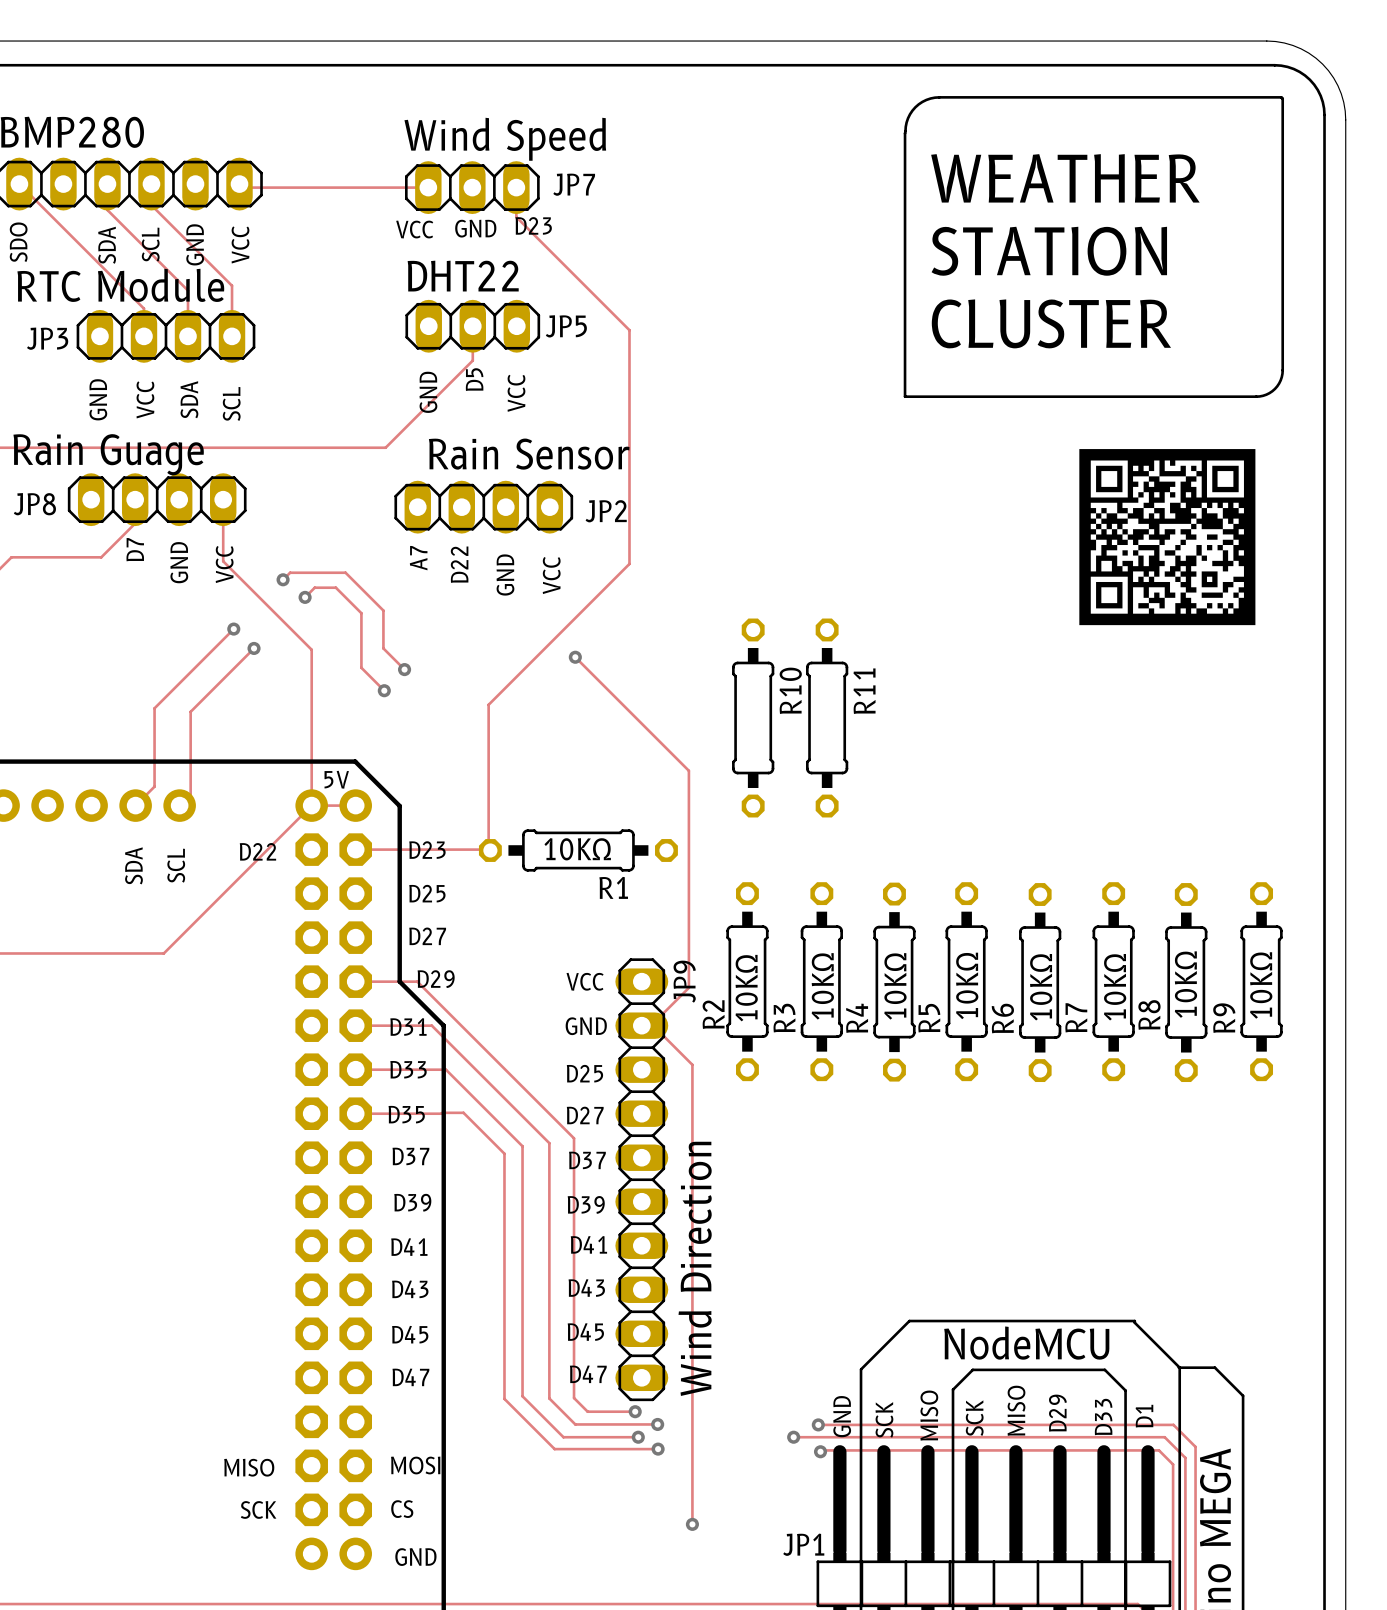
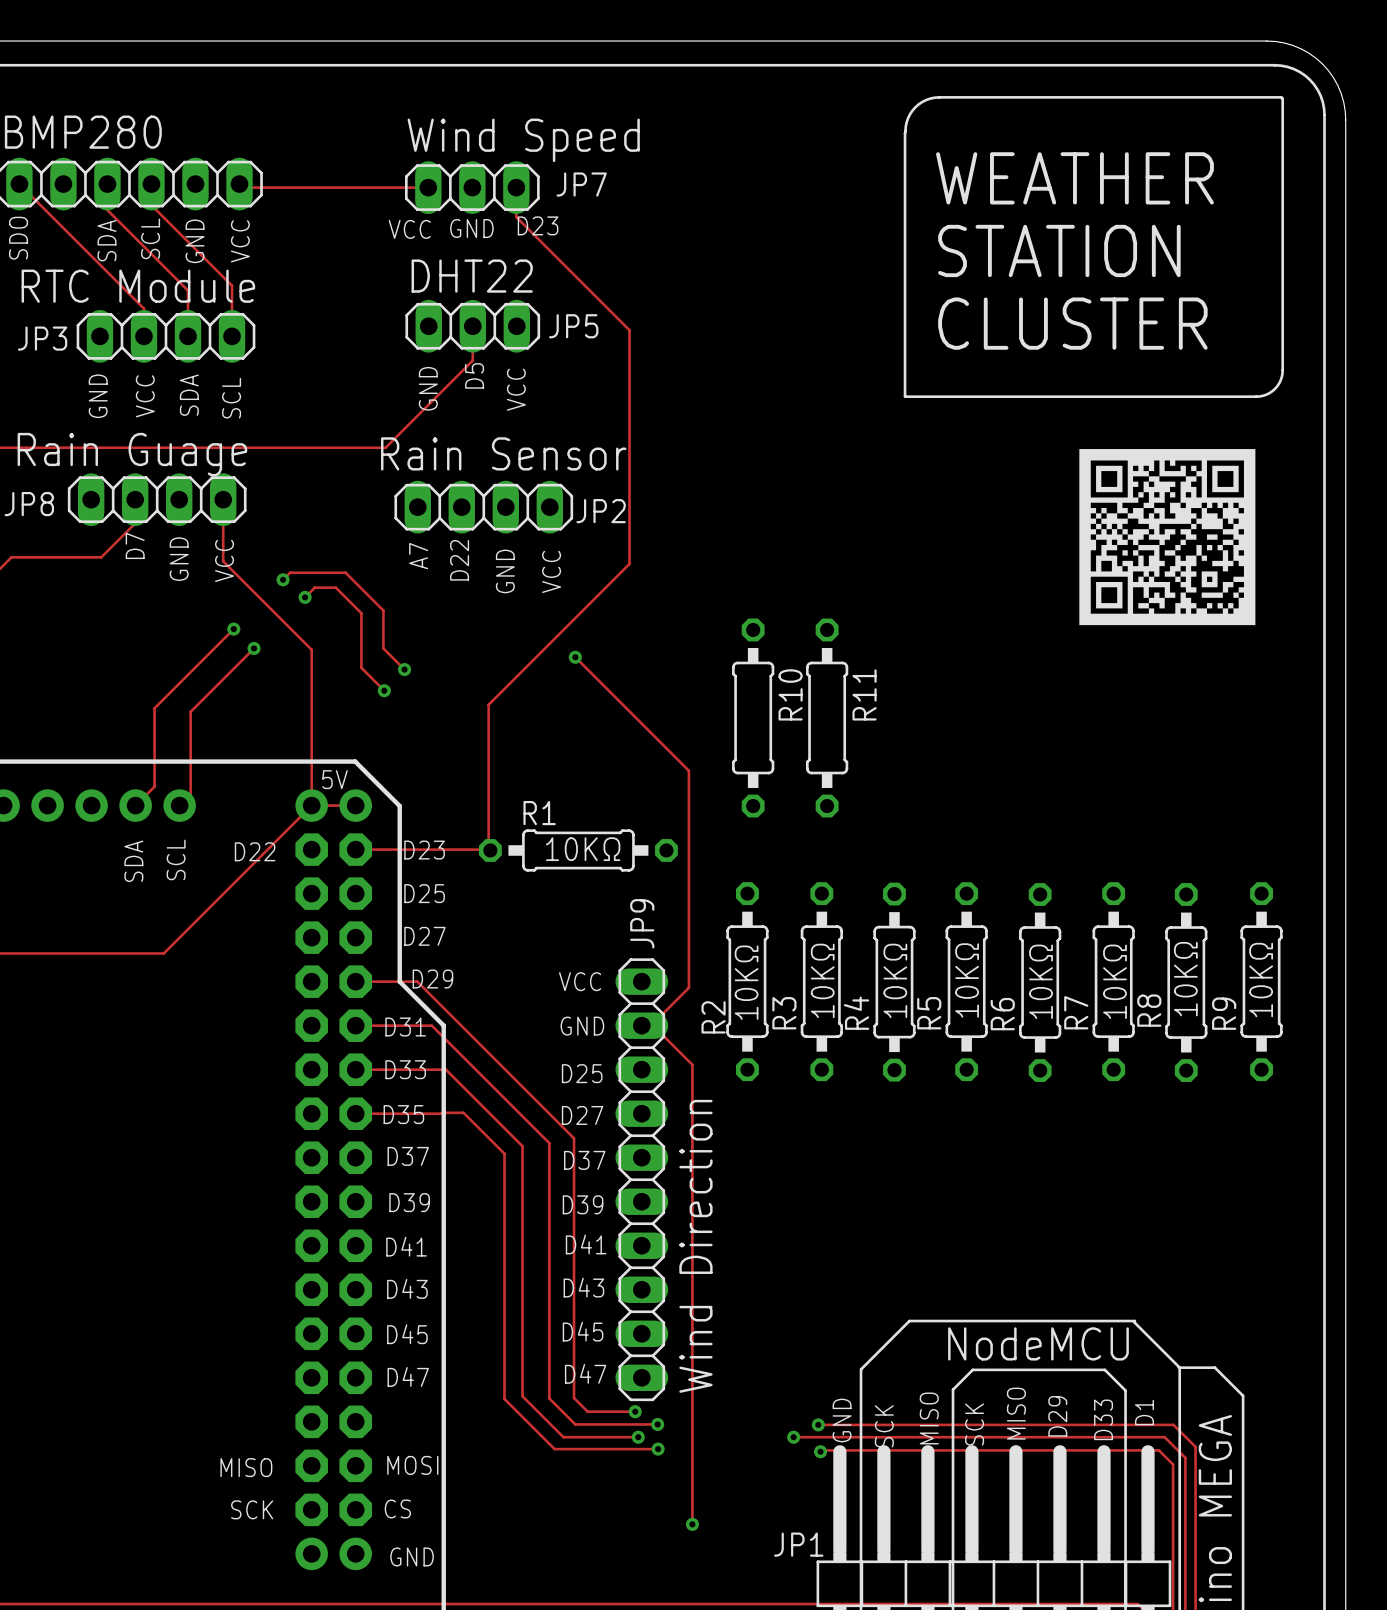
R1 name position: R1 (613, 887) -> R1 (539, 813)
JP9 name position: JP9 (684, 981) -> JP9 (642, 923)

